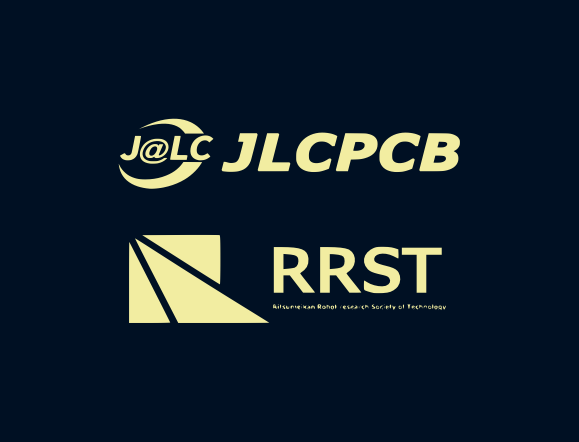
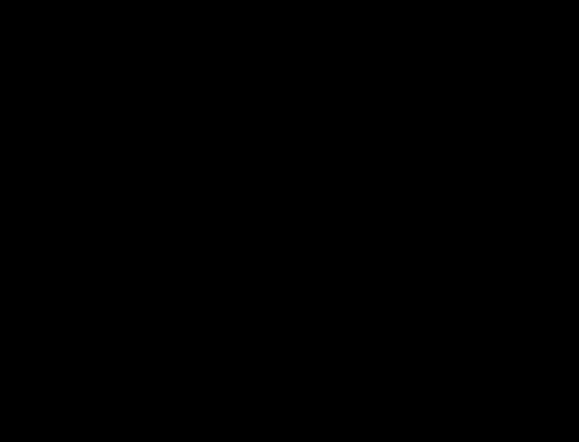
drawing: [118, 118, 460, 189] -> none
drawing: [129, 234, 446, 323] -> none

